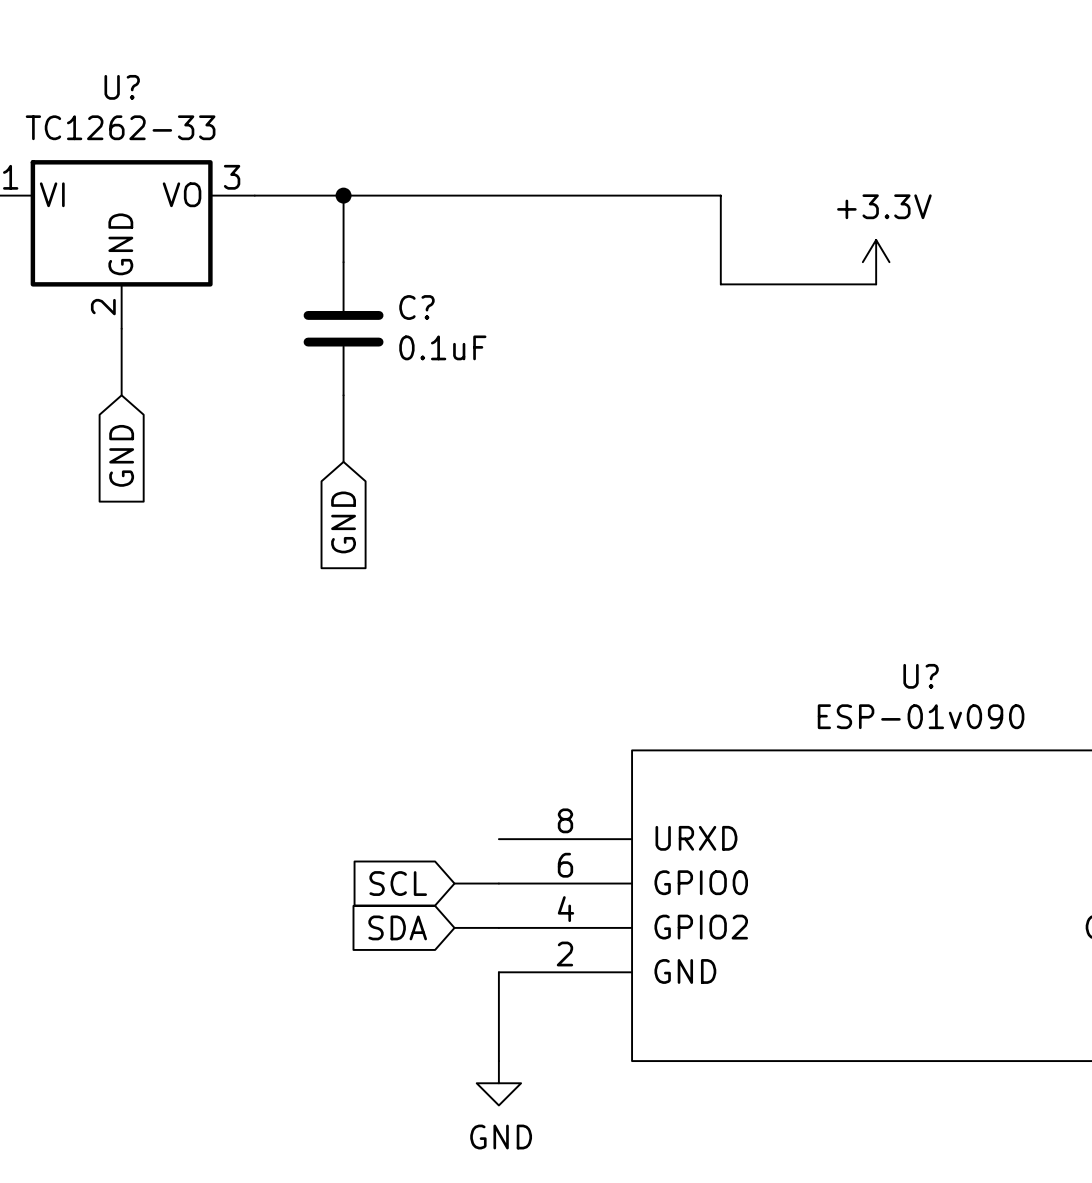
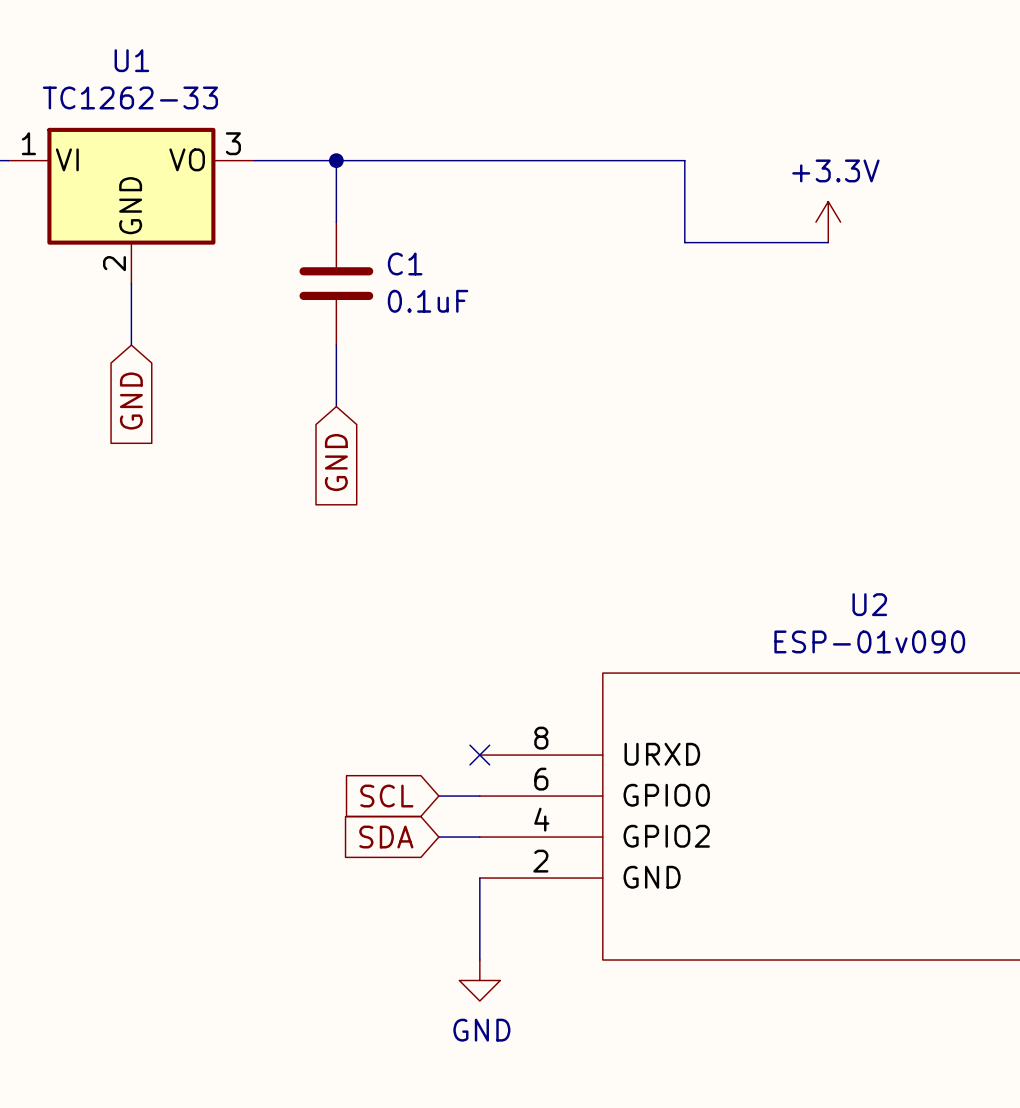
U? name: U? (122, 87) -> U1 (131, 60)
C? name: C? (416, 307) -> C1 (405, 263)
U? name: U? (921, 676) -> U2 (869, 604)
no-connect mark: none -> (479, 755)

